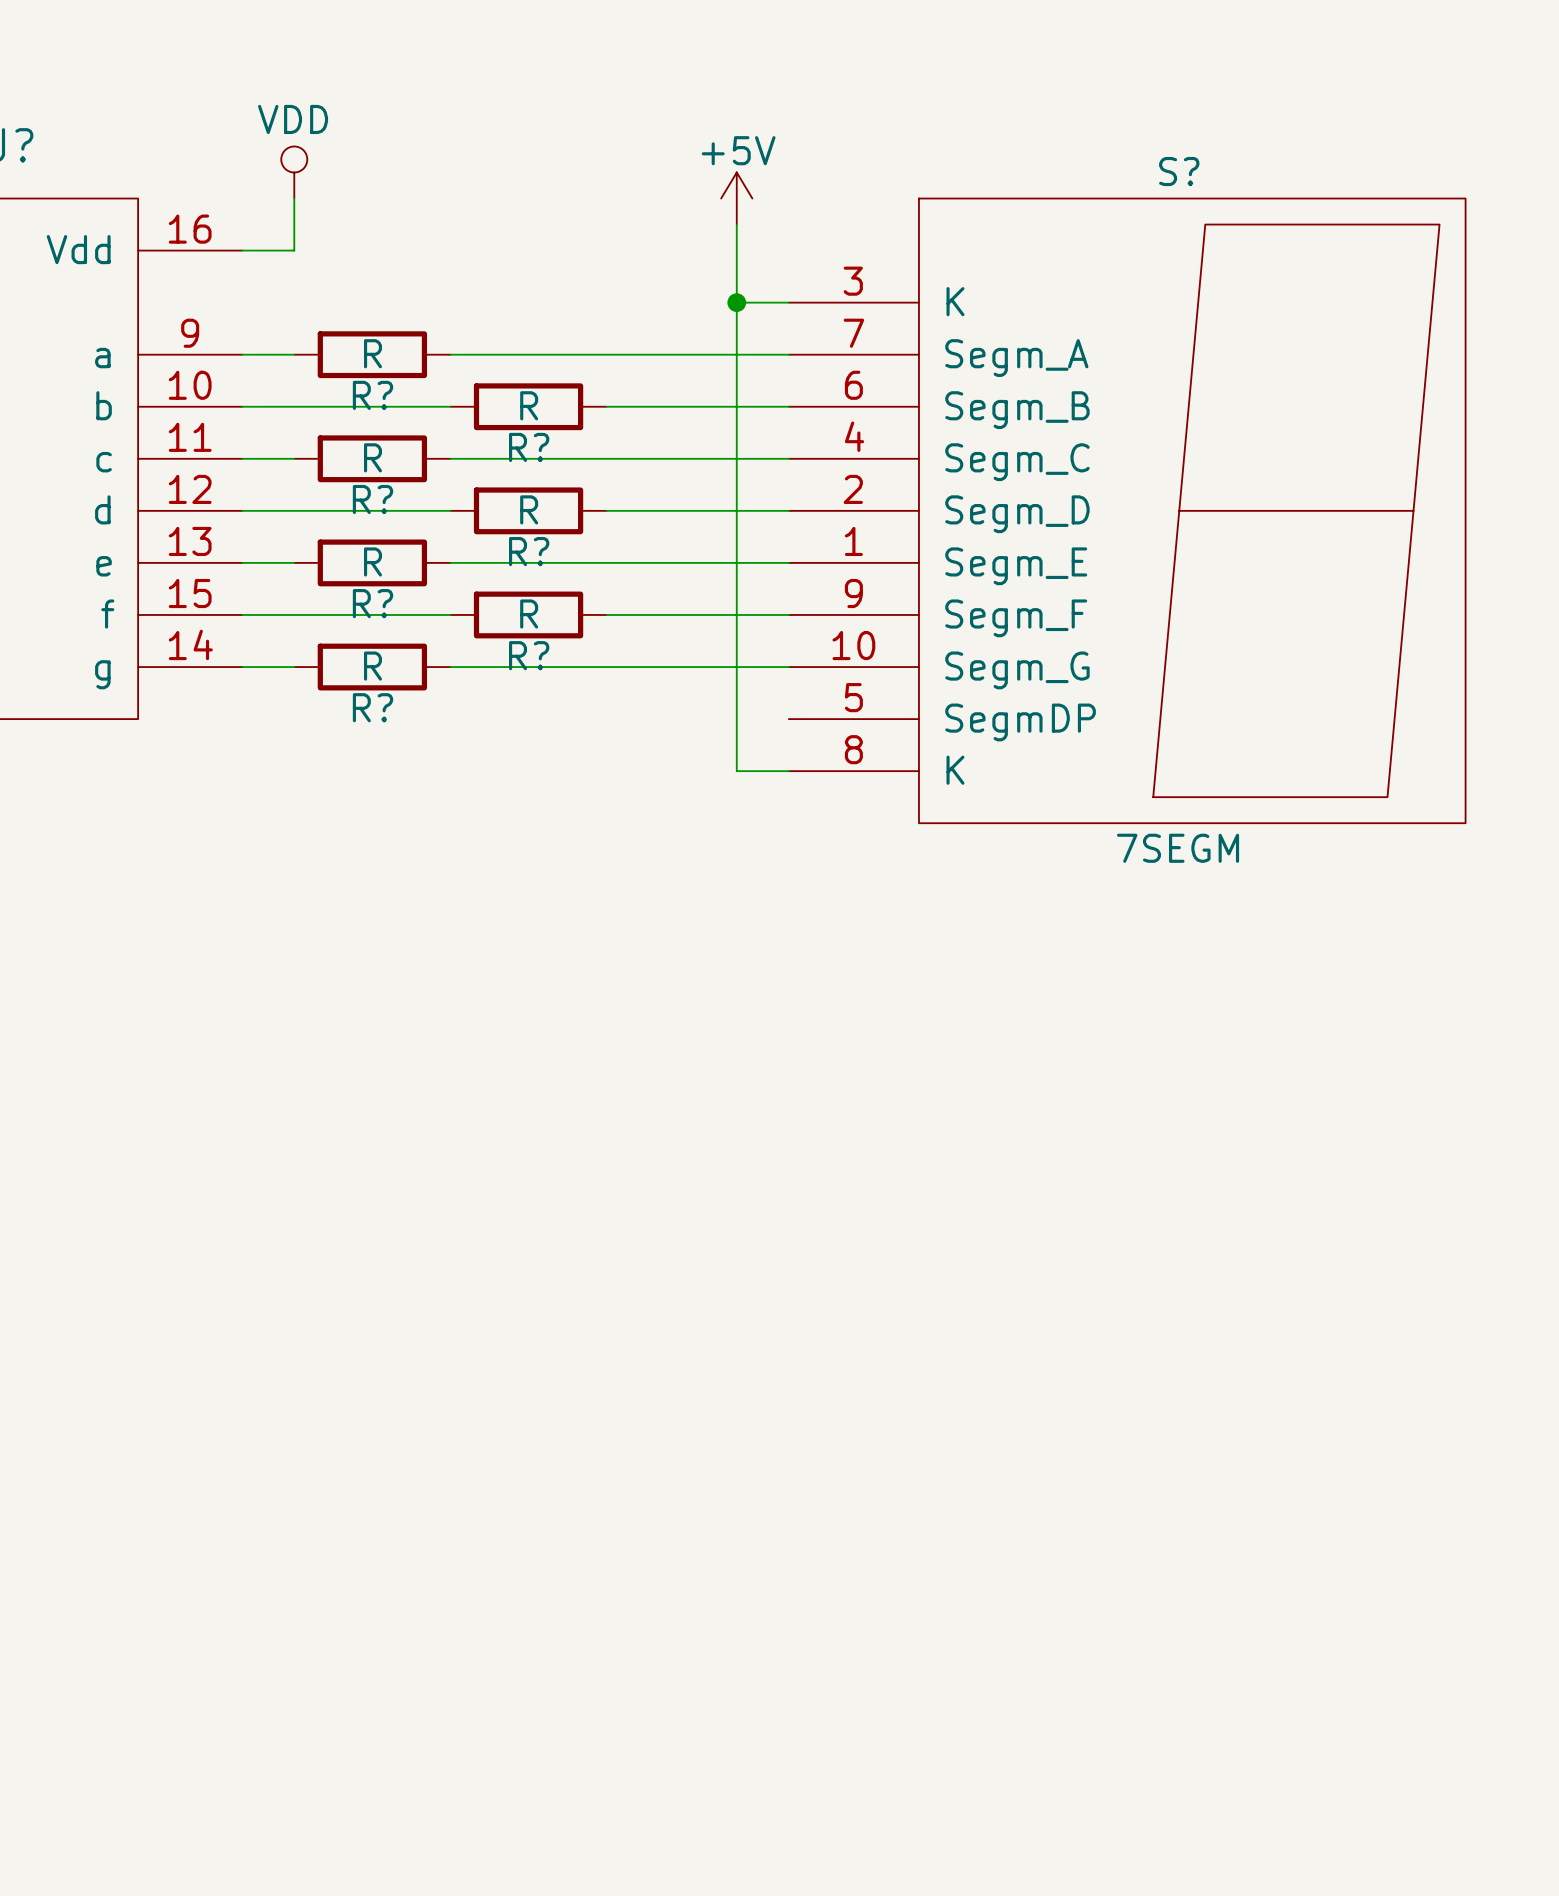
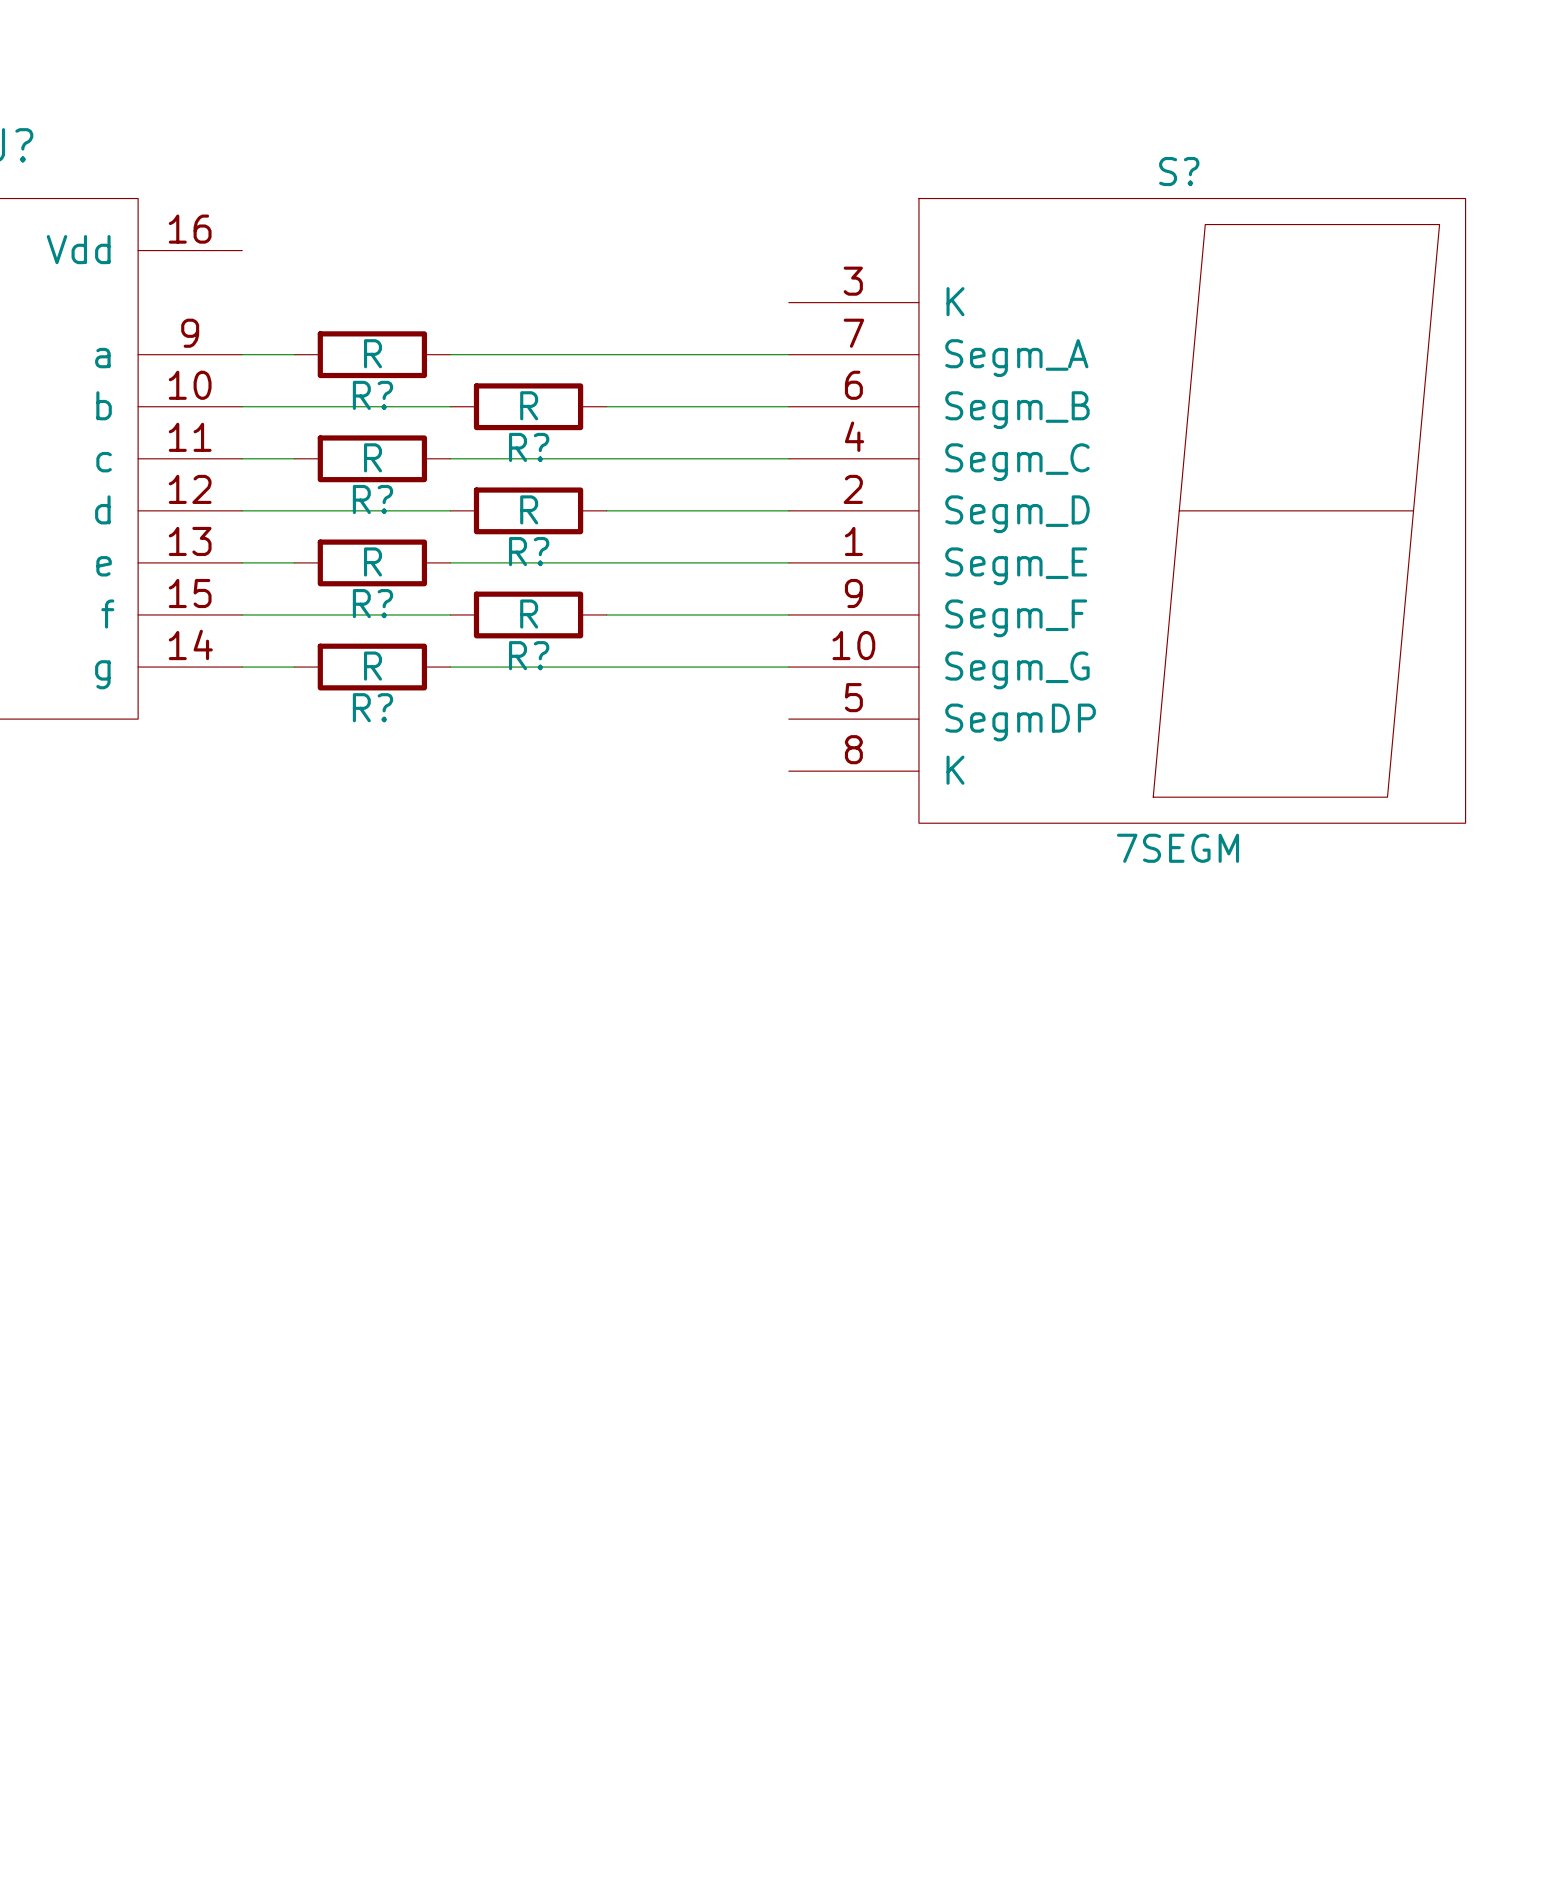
power symbol: VDD (294, 172) -> none
wire: (294, 198) (294, 250) (242, 250) -> none
power symbol: +5V (736, 198) -> none
wire: (736, 224) (736, 771) (788, 771) -> none
wire: (736, 302) (788, 302) -> none
junction: (736, 302) -> none

